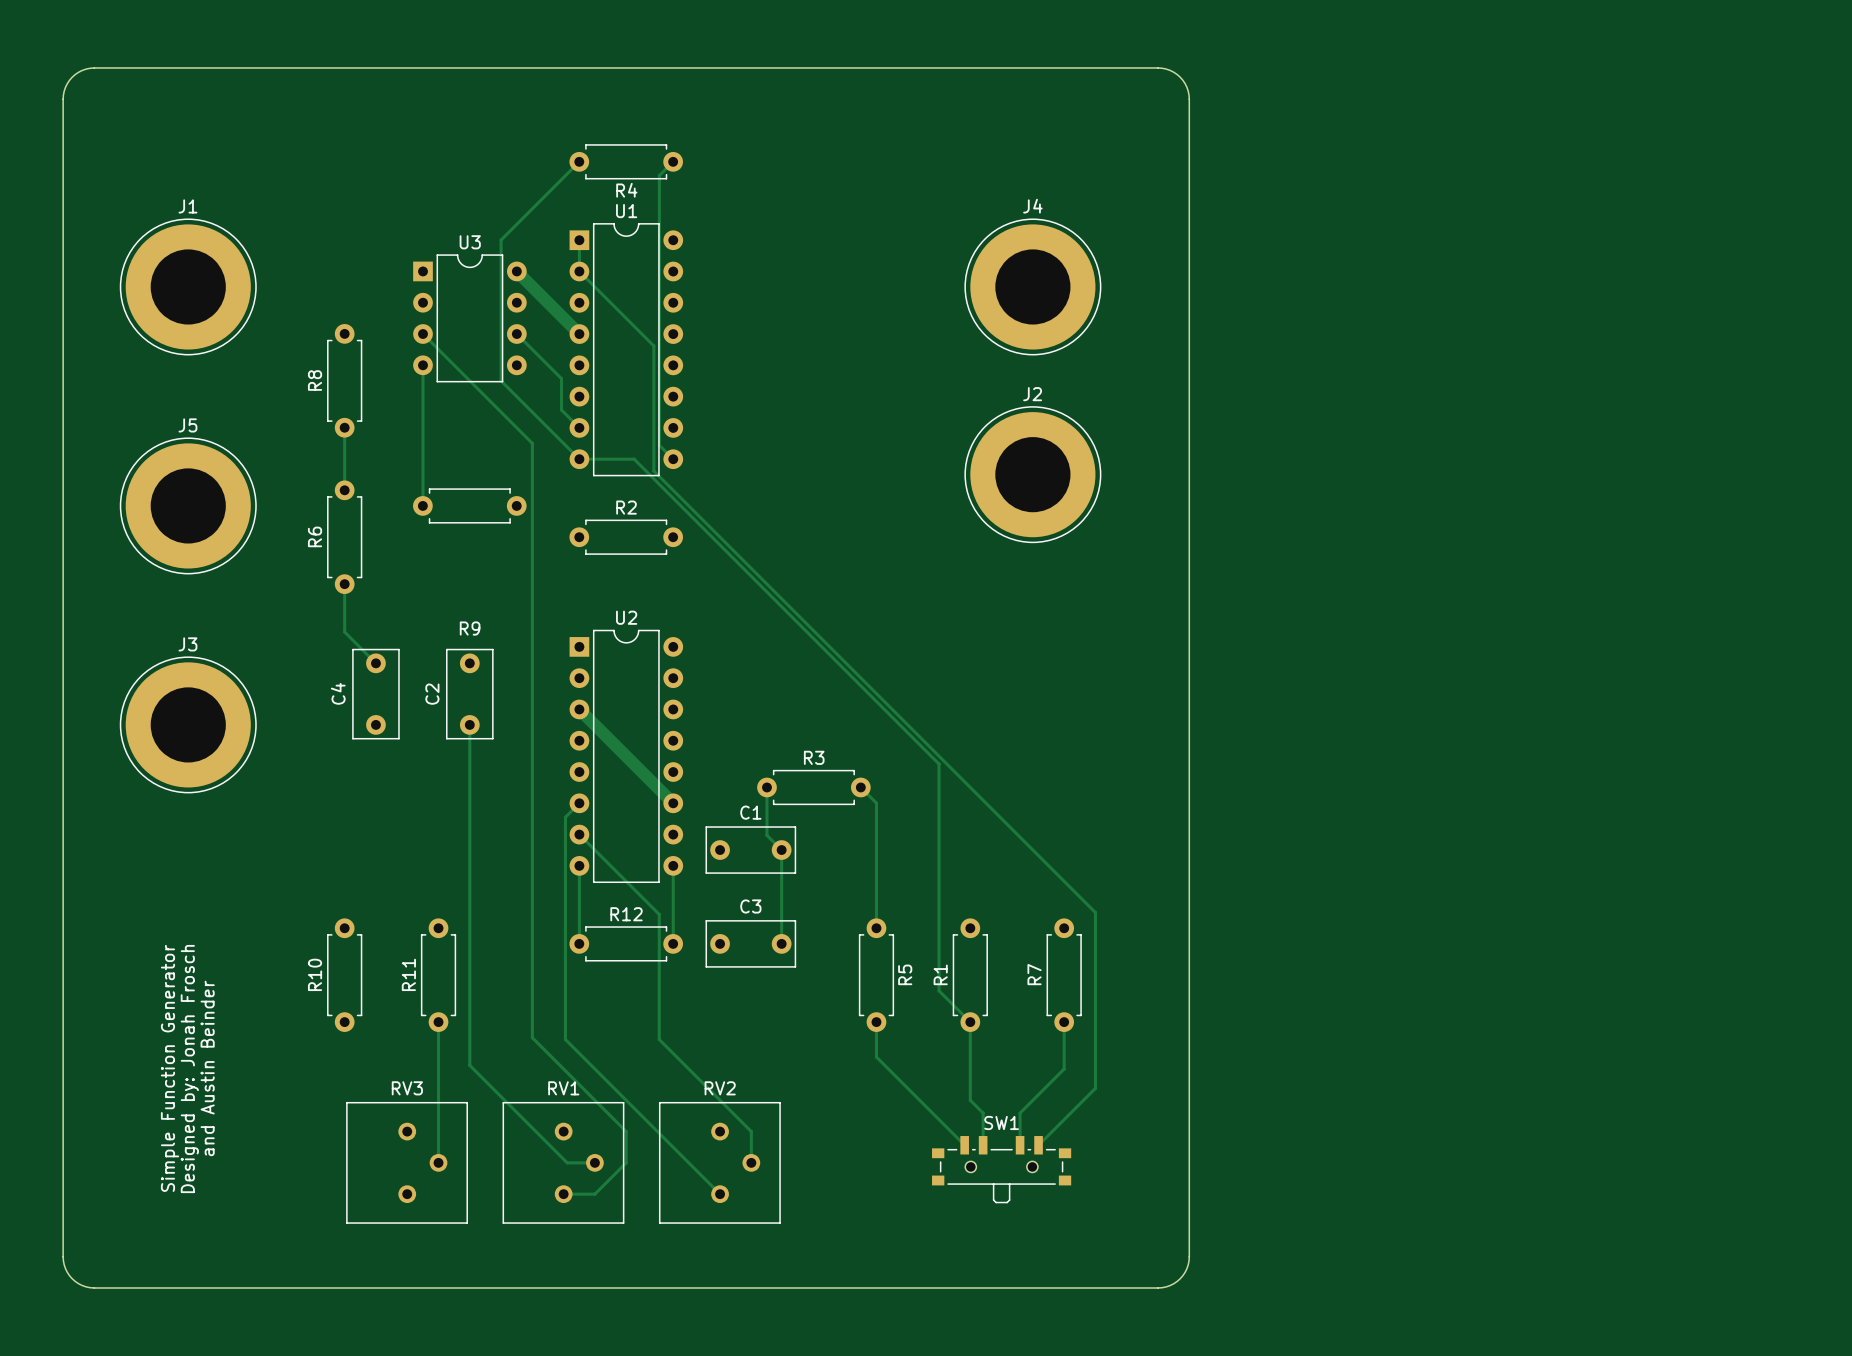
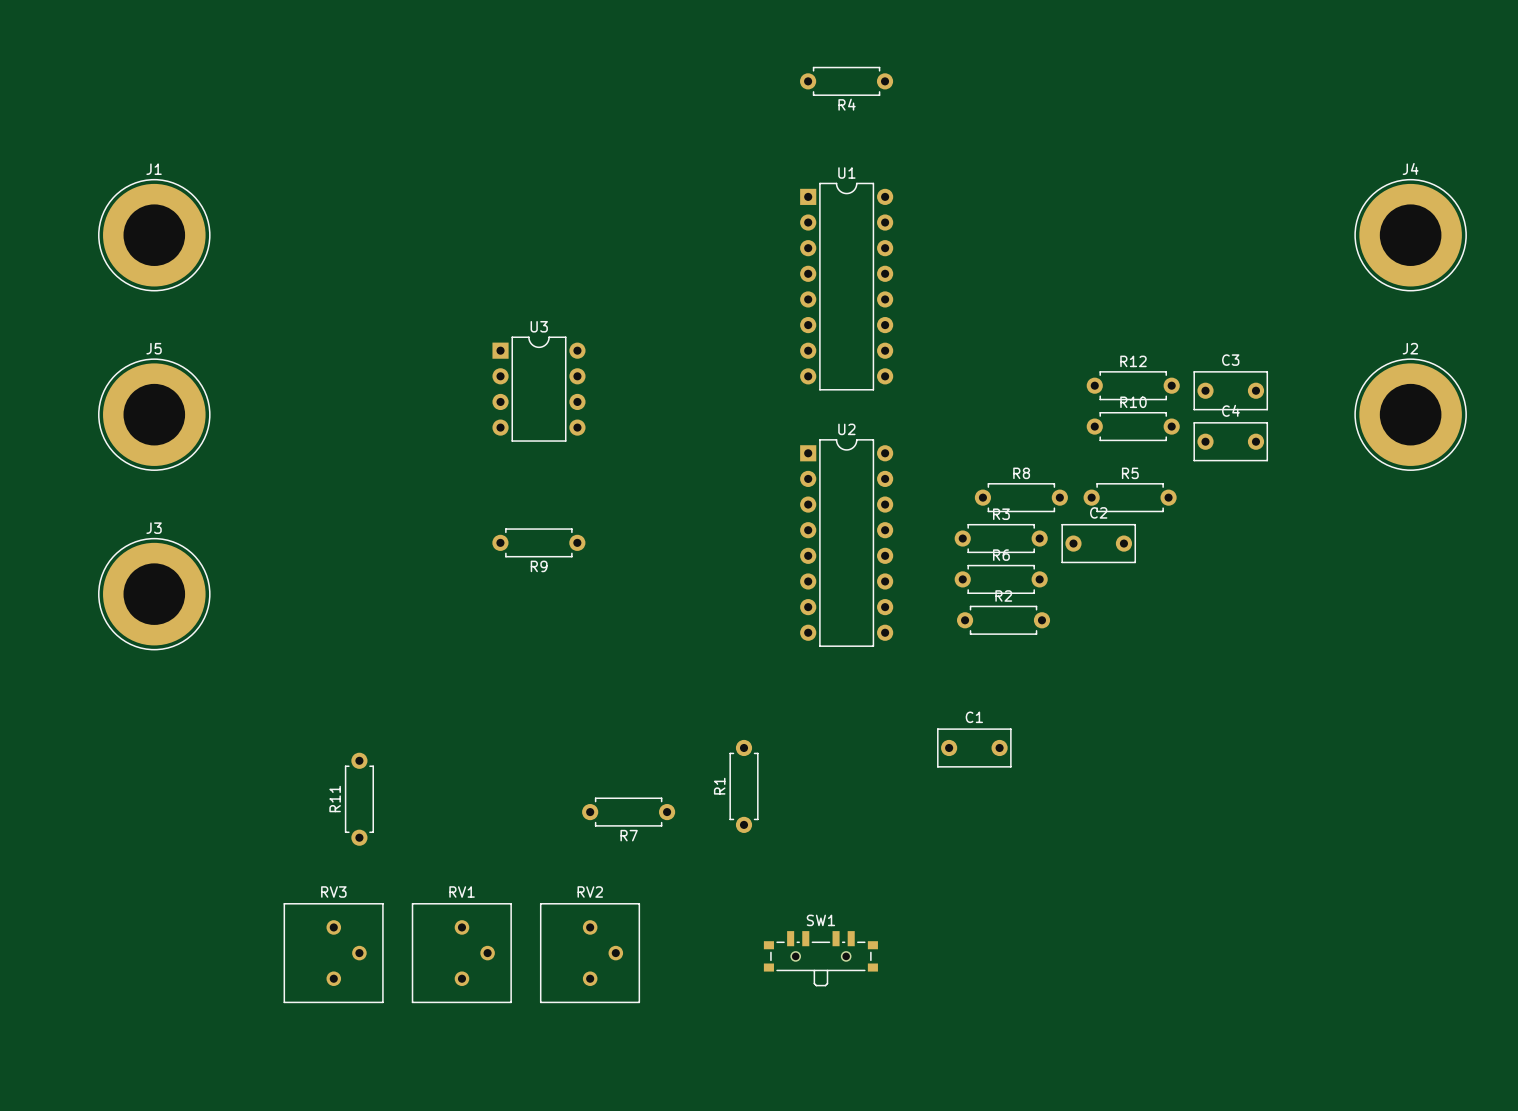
board edge: (94, 67) (1158, 67) (1169, 70) (1180, 77) (1186, 87) (1189, 99) (1189, 1256) (1186, 1268) (1180, 1278) (1169, 1285) (1158, 1288) (94, 1288) (82, 1285) (72, 1278) (65, 1268) (63, 1256) (63, 99) (65, 87) (72, 77) (82, 70) (94, 67) -> none
track: (579, 161) (501, 240) (501, 380) (579, 459) (634, 459) (939, 764) (939, 990) (970, 1022) (970, 1100) (983, 1113) (983, 1145) -> none
R4 position: (626, 161) -> (846, 81)
track: (673, 161) (659, 175) (659, 445) (673, 459) -> none
track: (579, 240) (579, 271) (653, 345) (653, 471) (1095, 912) (1095, 1088) (1038, 1145) -> none
track: (516, 271) (579, 334) -> none
J4 position: (1032, 286) -> (1410, 235)
U3 position: (469, 318) -> (538, 389)
track: (423, 334) (532, 443) (532, 1037) (626, 1131) (626, 1162) (594, 1194) (563, 1194) -> none
track: (516, 334) (561, 378) (561, 410) (579, 427) -> none
U1 position: (626, 349) -> (846, 286)
track: (423, 365) (423, 505) -> none
R8 rotation: 0° (344, 380) -> 90° clockwise (1021, 497)
R8 position: (344, 380) -> (1021, 497)
track: (344, 427) (344, 490) -> none
J2 position: (1032, 474) -> (1410, 414)
R9 position: (469, 505) -> (538, 542)
R6 rotation: 0° (344, 537) -> 90° clockwise (1001, 579)
R6 position: (344, 537) -> (1001, 579)
R2 position: (626, 537) -> (1003, 620)
track: (344, 584) (344, 632) (375, 663) -> none
R9 name position: R9 (470, 628) -> R9 (539, 566)
C4 rotation: 0° (375, 694) -> 90° clockwise (1230, 441)
C4 position: (375, 694) -> (1230, 441)
C2 rotation: 0° (469, 694) -> 90° clockwise (1098, 543)
C2 position: (469, 694) -> (1098, 543)
track: (579, 709) (673, 803) -> none
track: (469, 724) (469, 1065) (567, 1162) (594, 1162) -> none
U2 position: (626, 756) -> (846, 543)
track: (766, 787) (766, 835) (781, 850) (781, 943) -> none
R3 position: (813, 787) -> (1001, 538)
track: (860, 787) (876, 803) (876, 928) -> none
track: (579, 803) (565, 817) (565, 1039) (720, 1194) -> none
track: (579, 834) (659, 914) (659, 1039) (751, 1131) (751, 1162) -> none
C1 position: (750, 850) -> (974, 747)
track: (579, 865) (579, 943) -> none
track: (673, 865) (673, 943) -> none
R12 position: (626, 943) -> (1133, 385)
C3 position: (750, 943) -> (1230, 390)
R5 name position: R5 (905, 974) -> R5 (1130, 473)
R7 name position: R7 (1034, 974) -> R7 (629, 835)
R10 rotation: 0° (344, 975) -> 90° clockwise (1133, 426)
R10 position: (344, 975) -> (1133, 426)
R5 rotation: 0° (876, 975) -> 90° clockwise (1130, 497)
R5 position: (876, 975) -> (1130, 497)
R1 position: (970, 975) -> (744, 786)
R7 rotation: 0° (1064, 975) -> 90° clockwise (628, 812)
R7 position: (1064, 975) -> (628, 812)
track: (438, 1022) (438, 1162) -> none
track: (876, 1022) (876, 1057) (964, 1145) -> none
track: (1064, 1022) (1064, 1069) (1020, 1113) (1020, 1145) -> none
text: Simple Function Generator (170, 1068) -> none
text: and Austin Beinder (207, 1068) -> none
text: Designed by: Jonah Frosch (189, 1069) -> none

